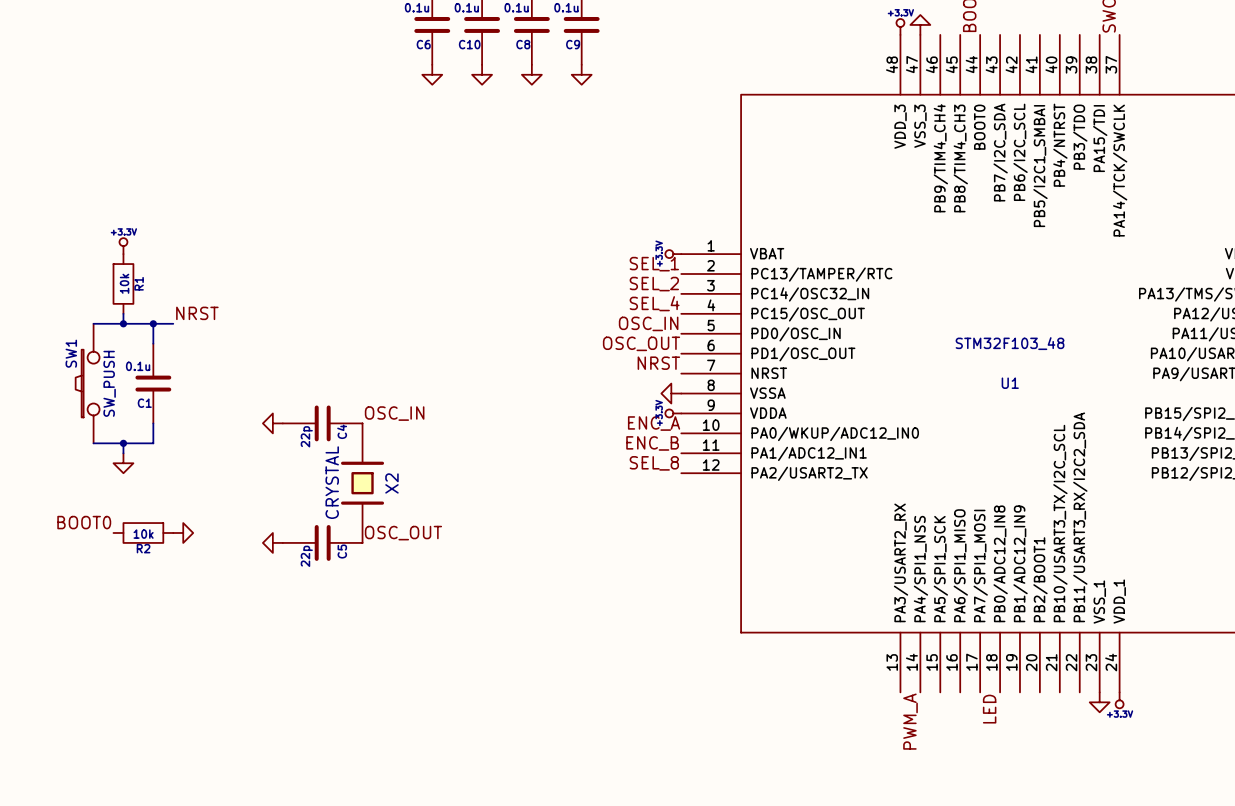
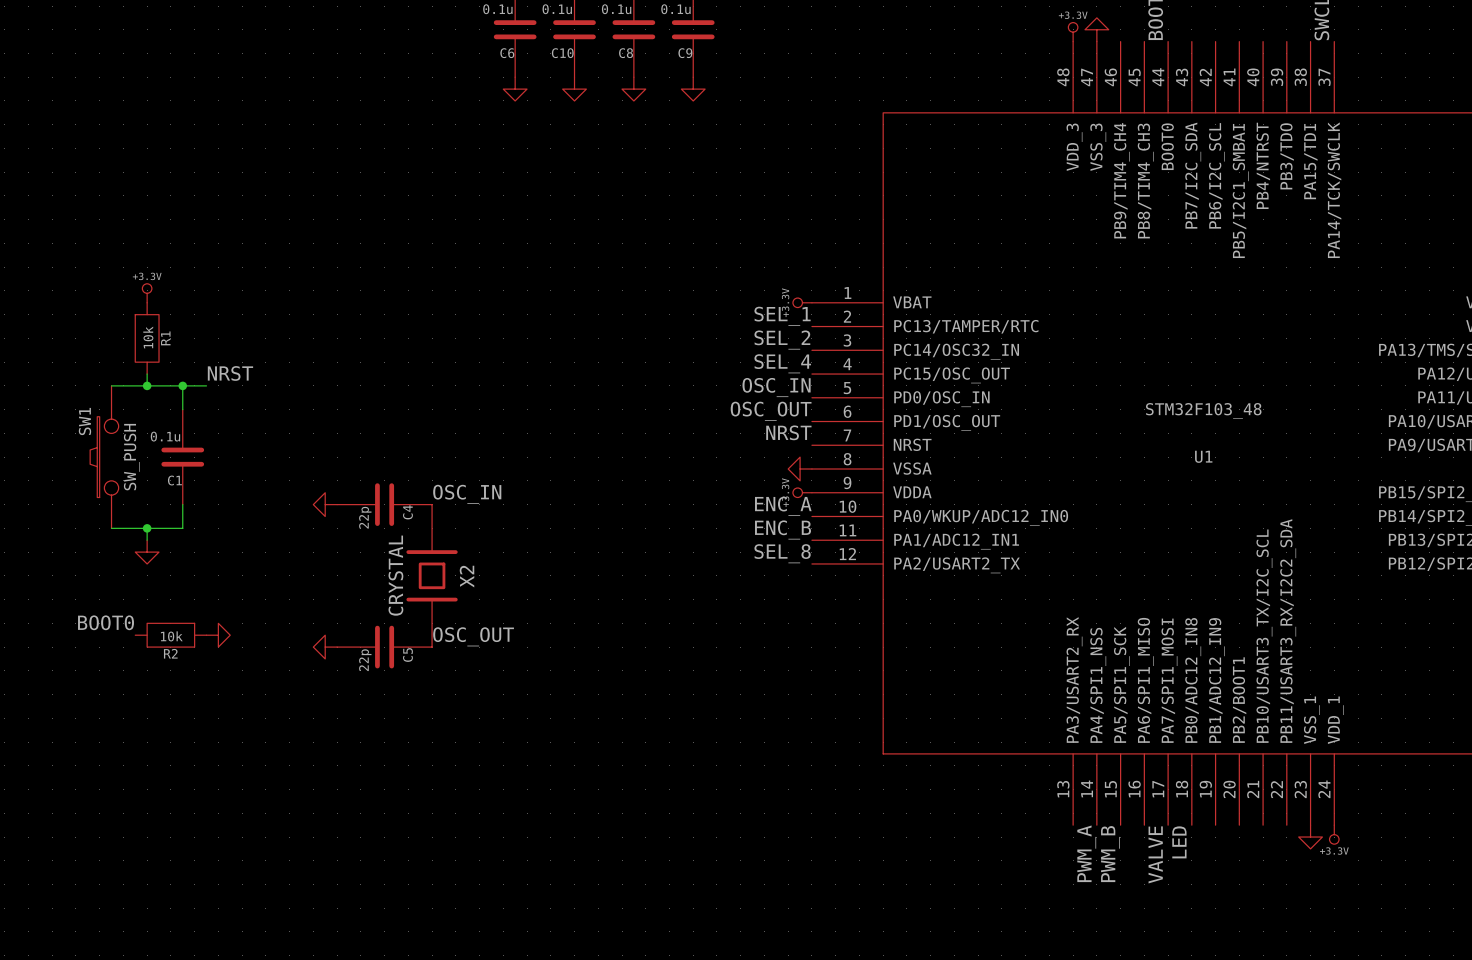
label: none -> VALVE (1155, 854)
label: none -> PWM_B (1110, 854)

